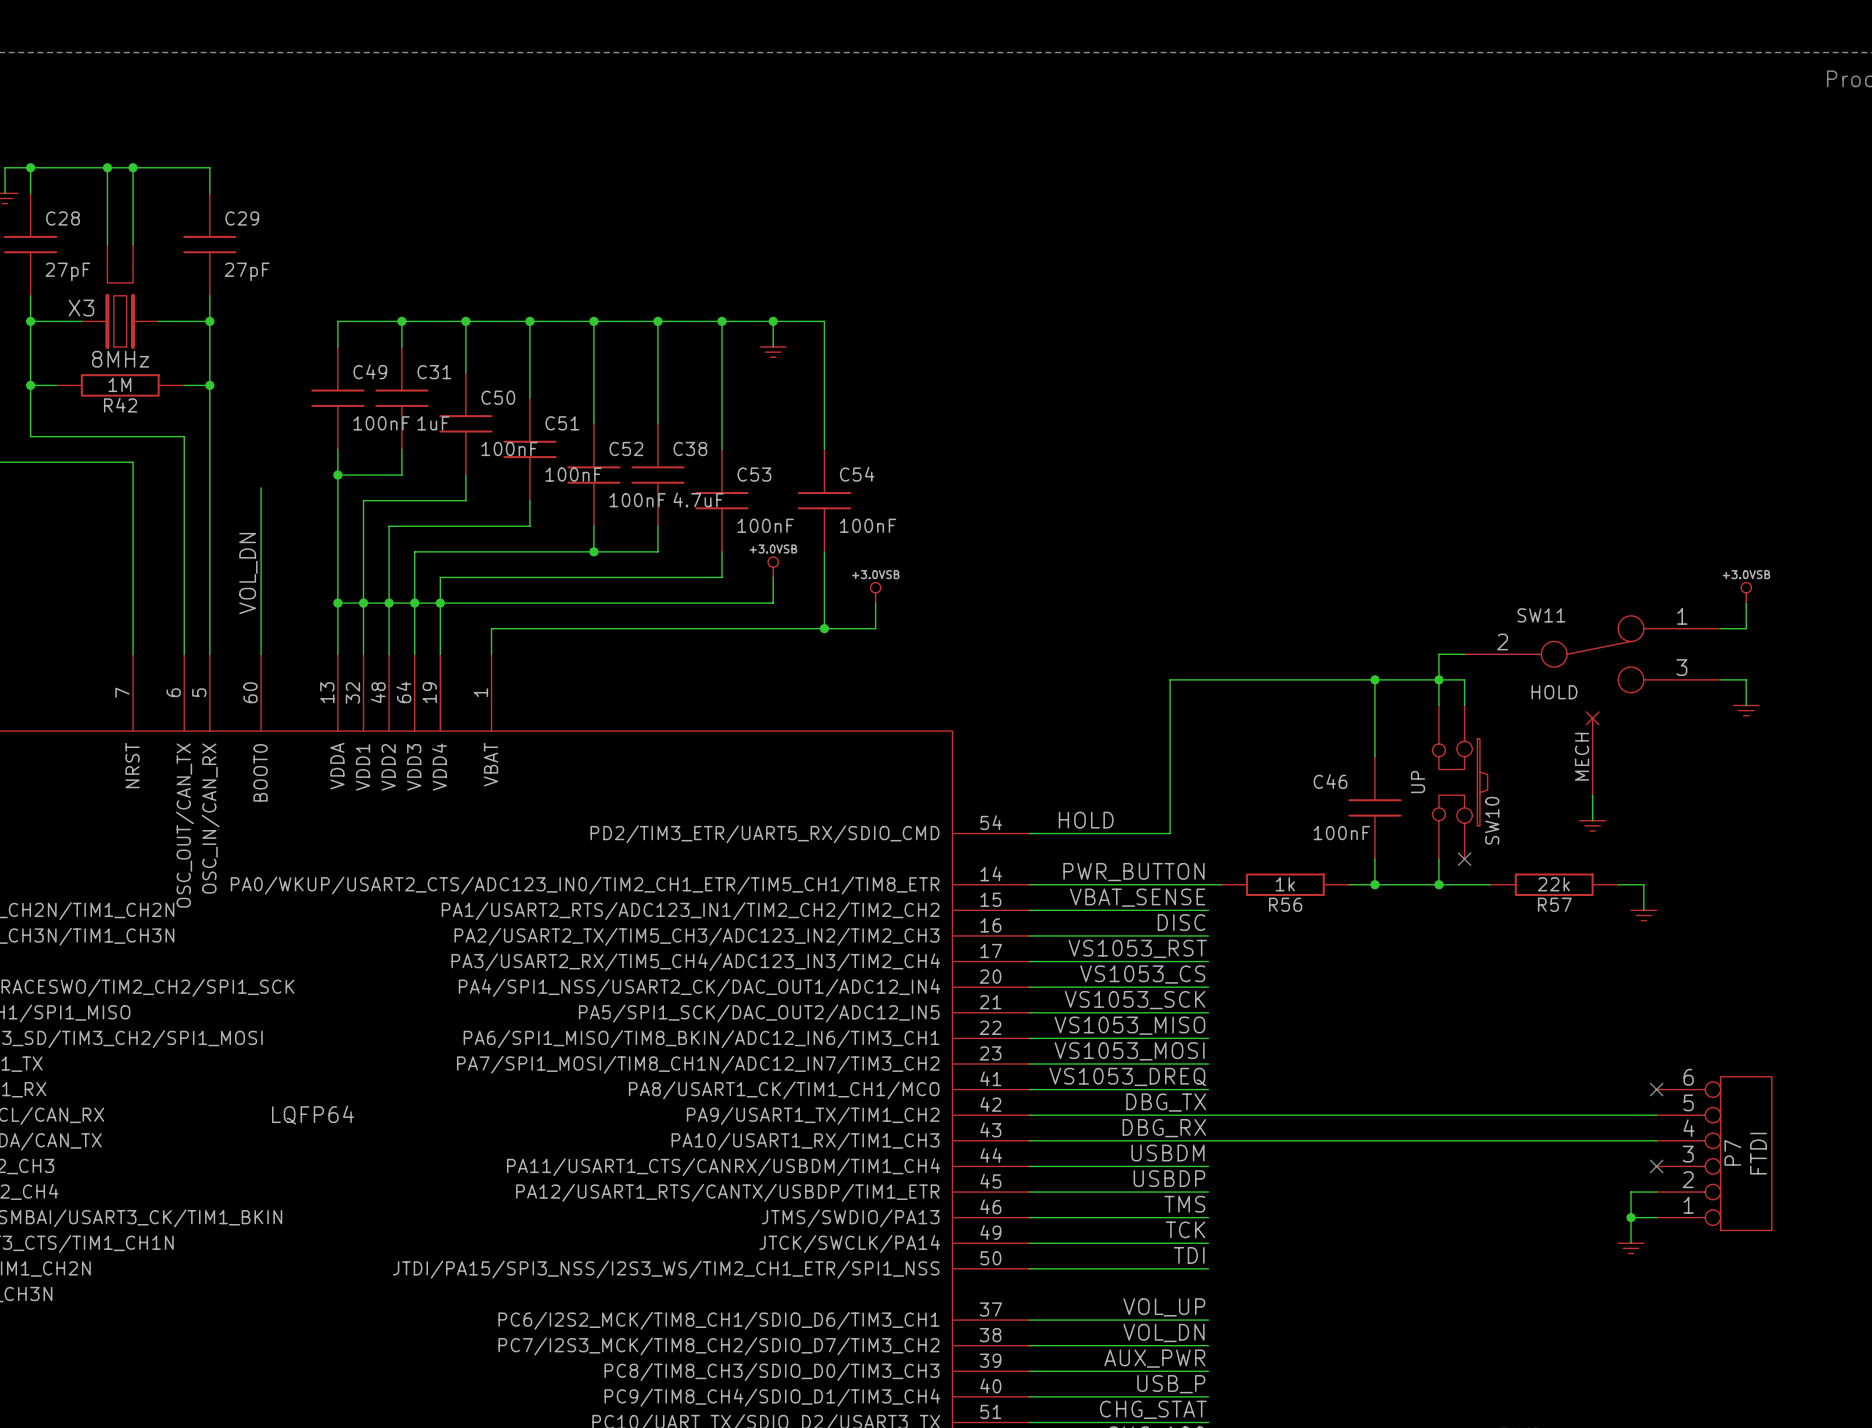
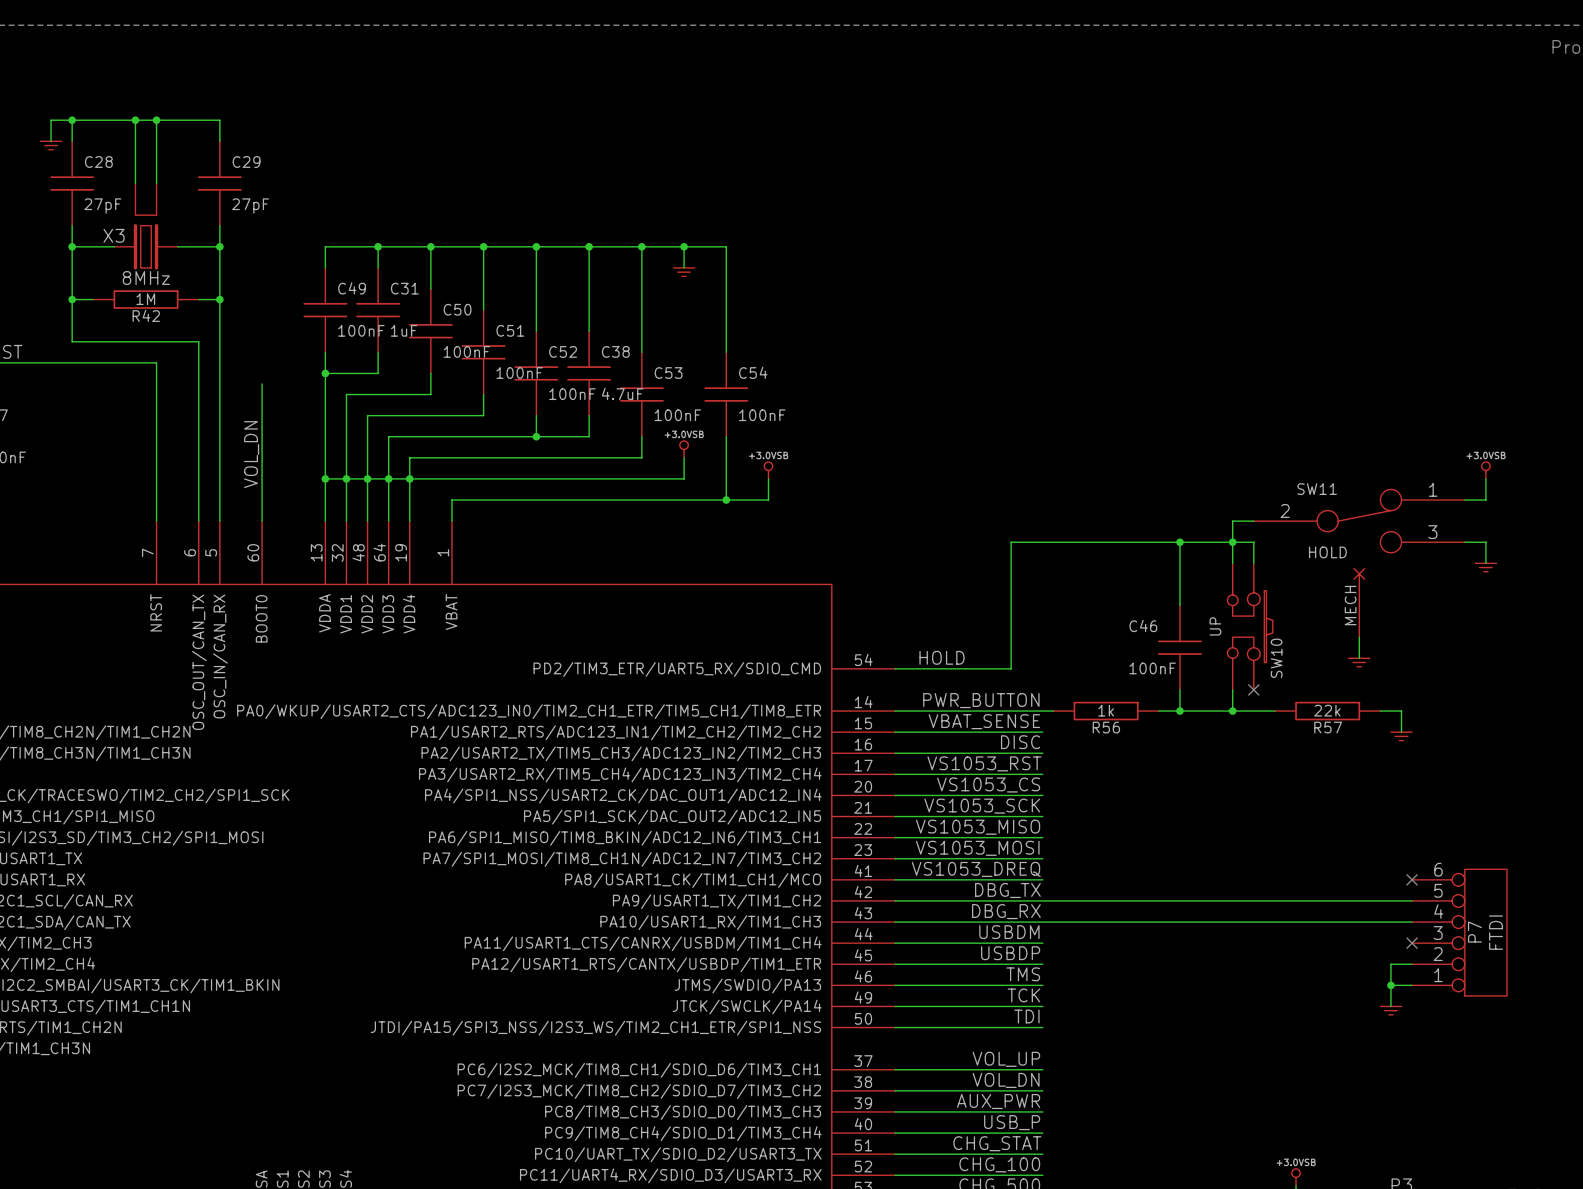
part text: LQFP64 (313, 1115) -> none

